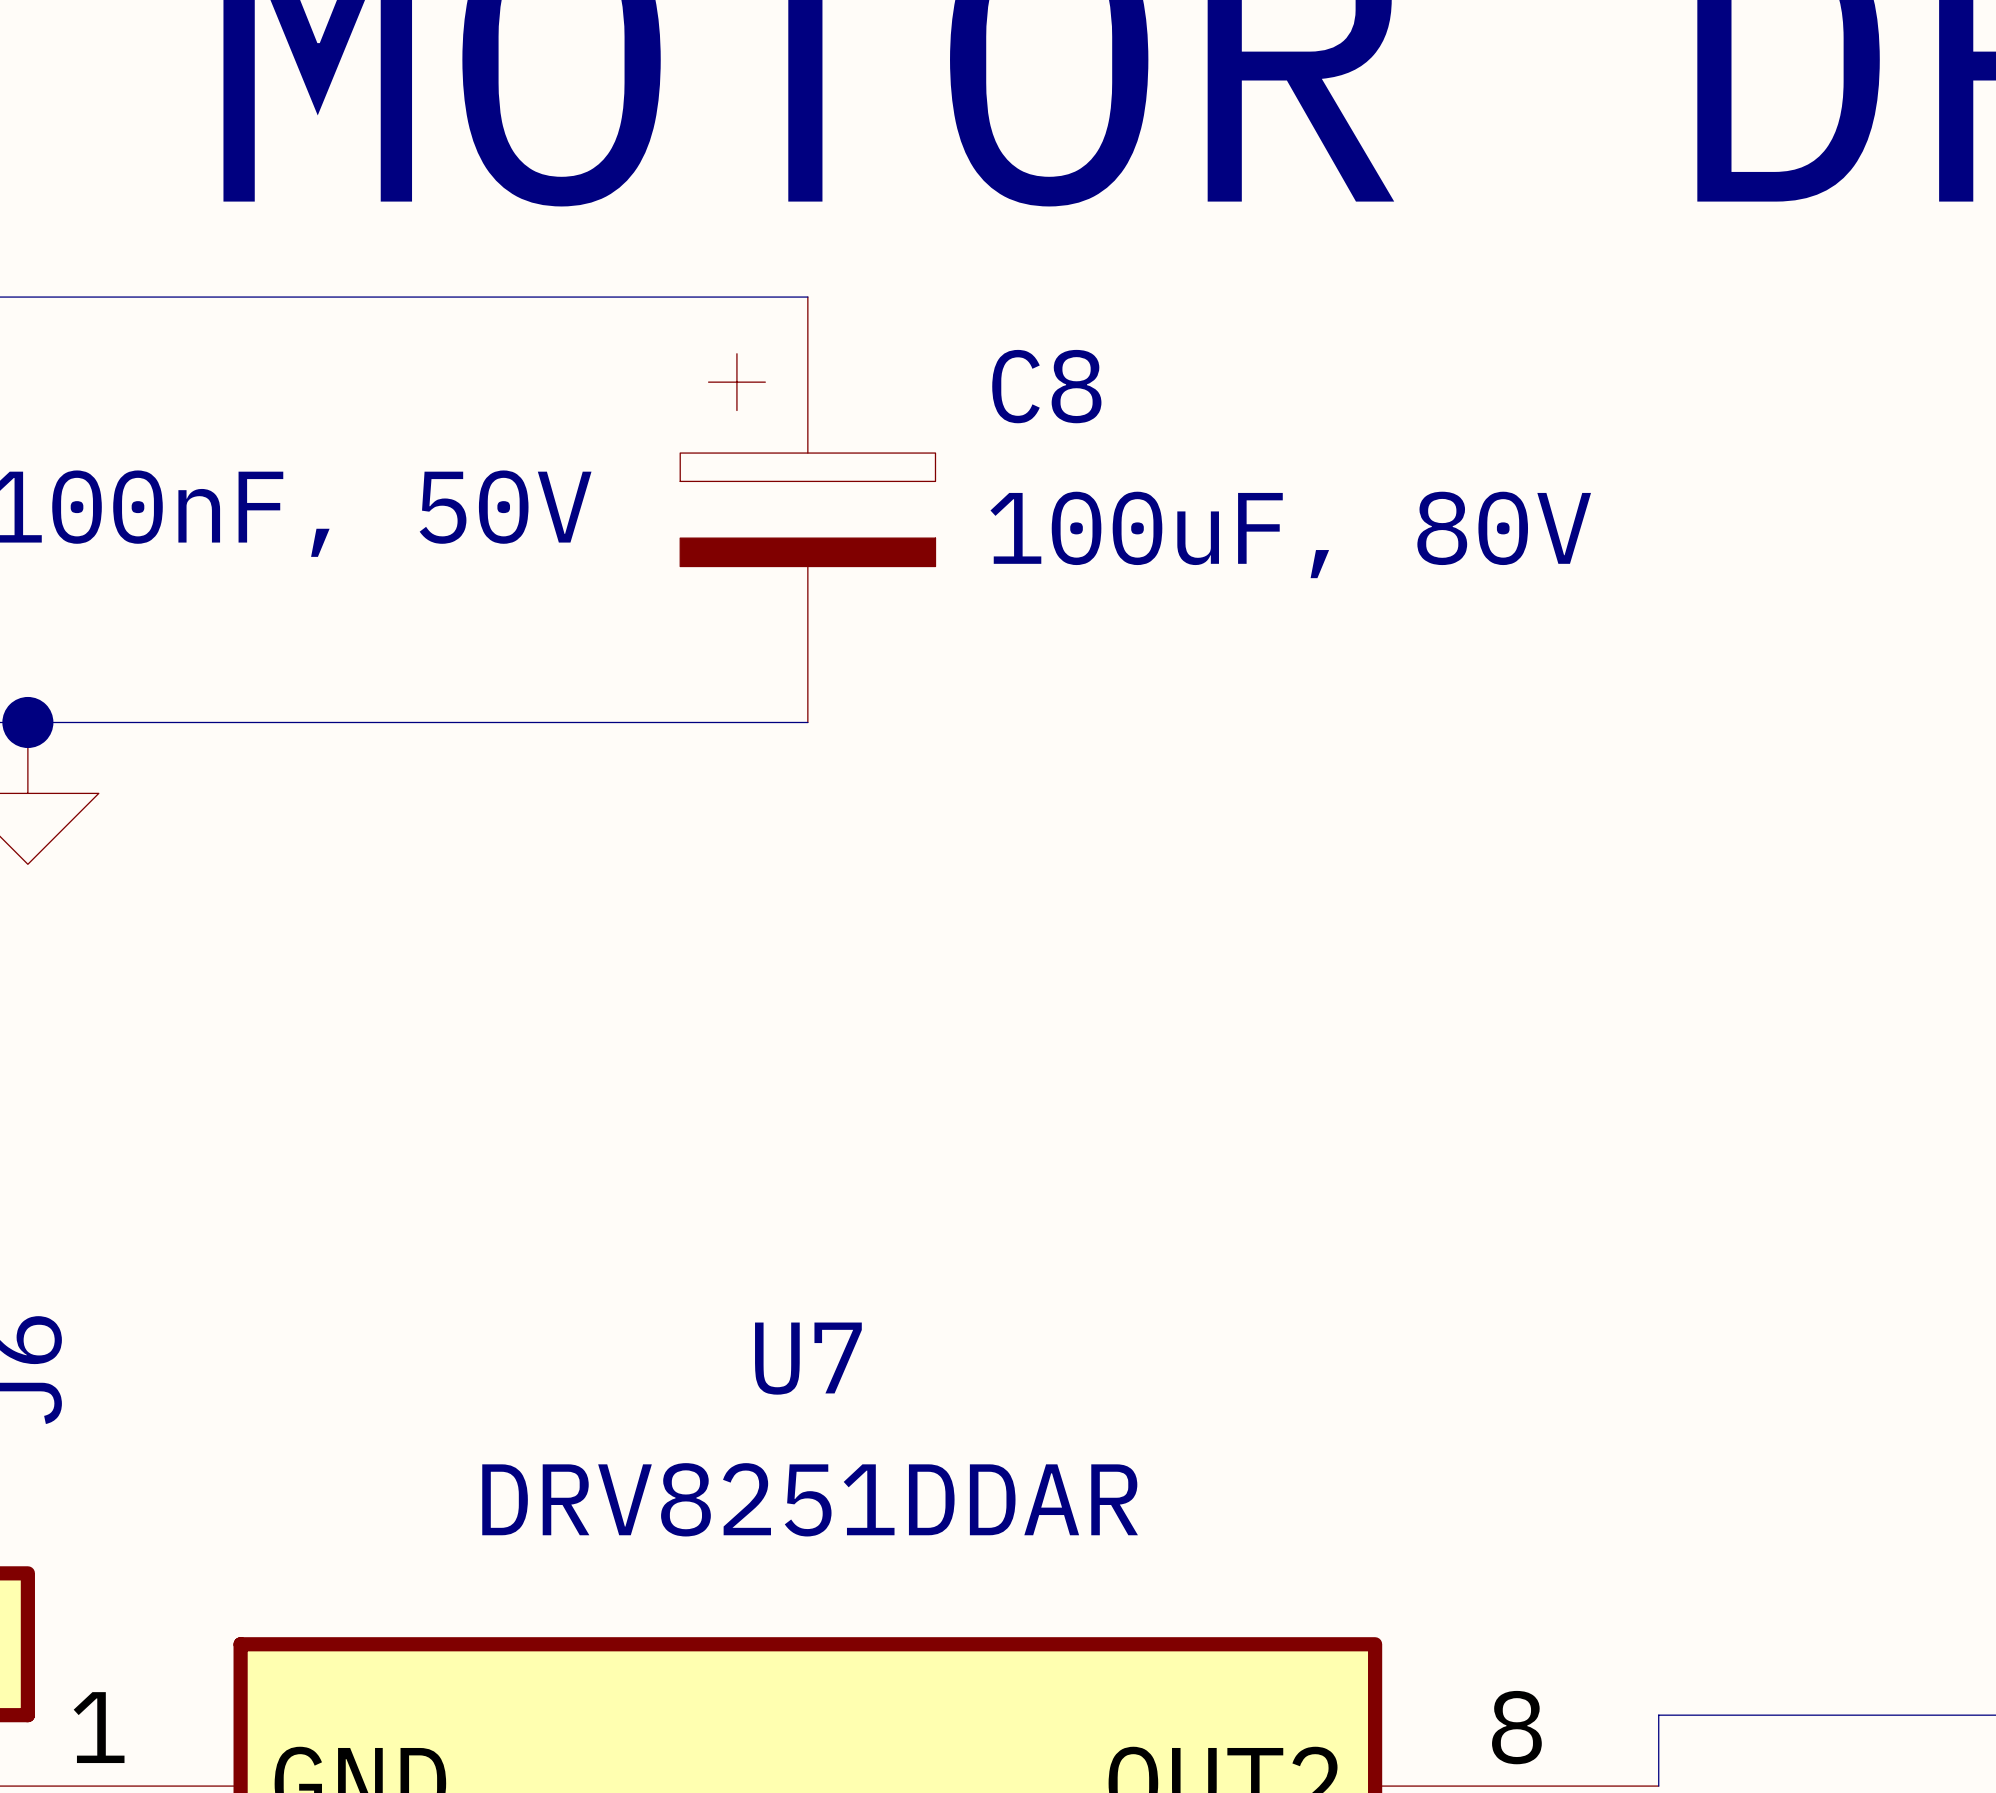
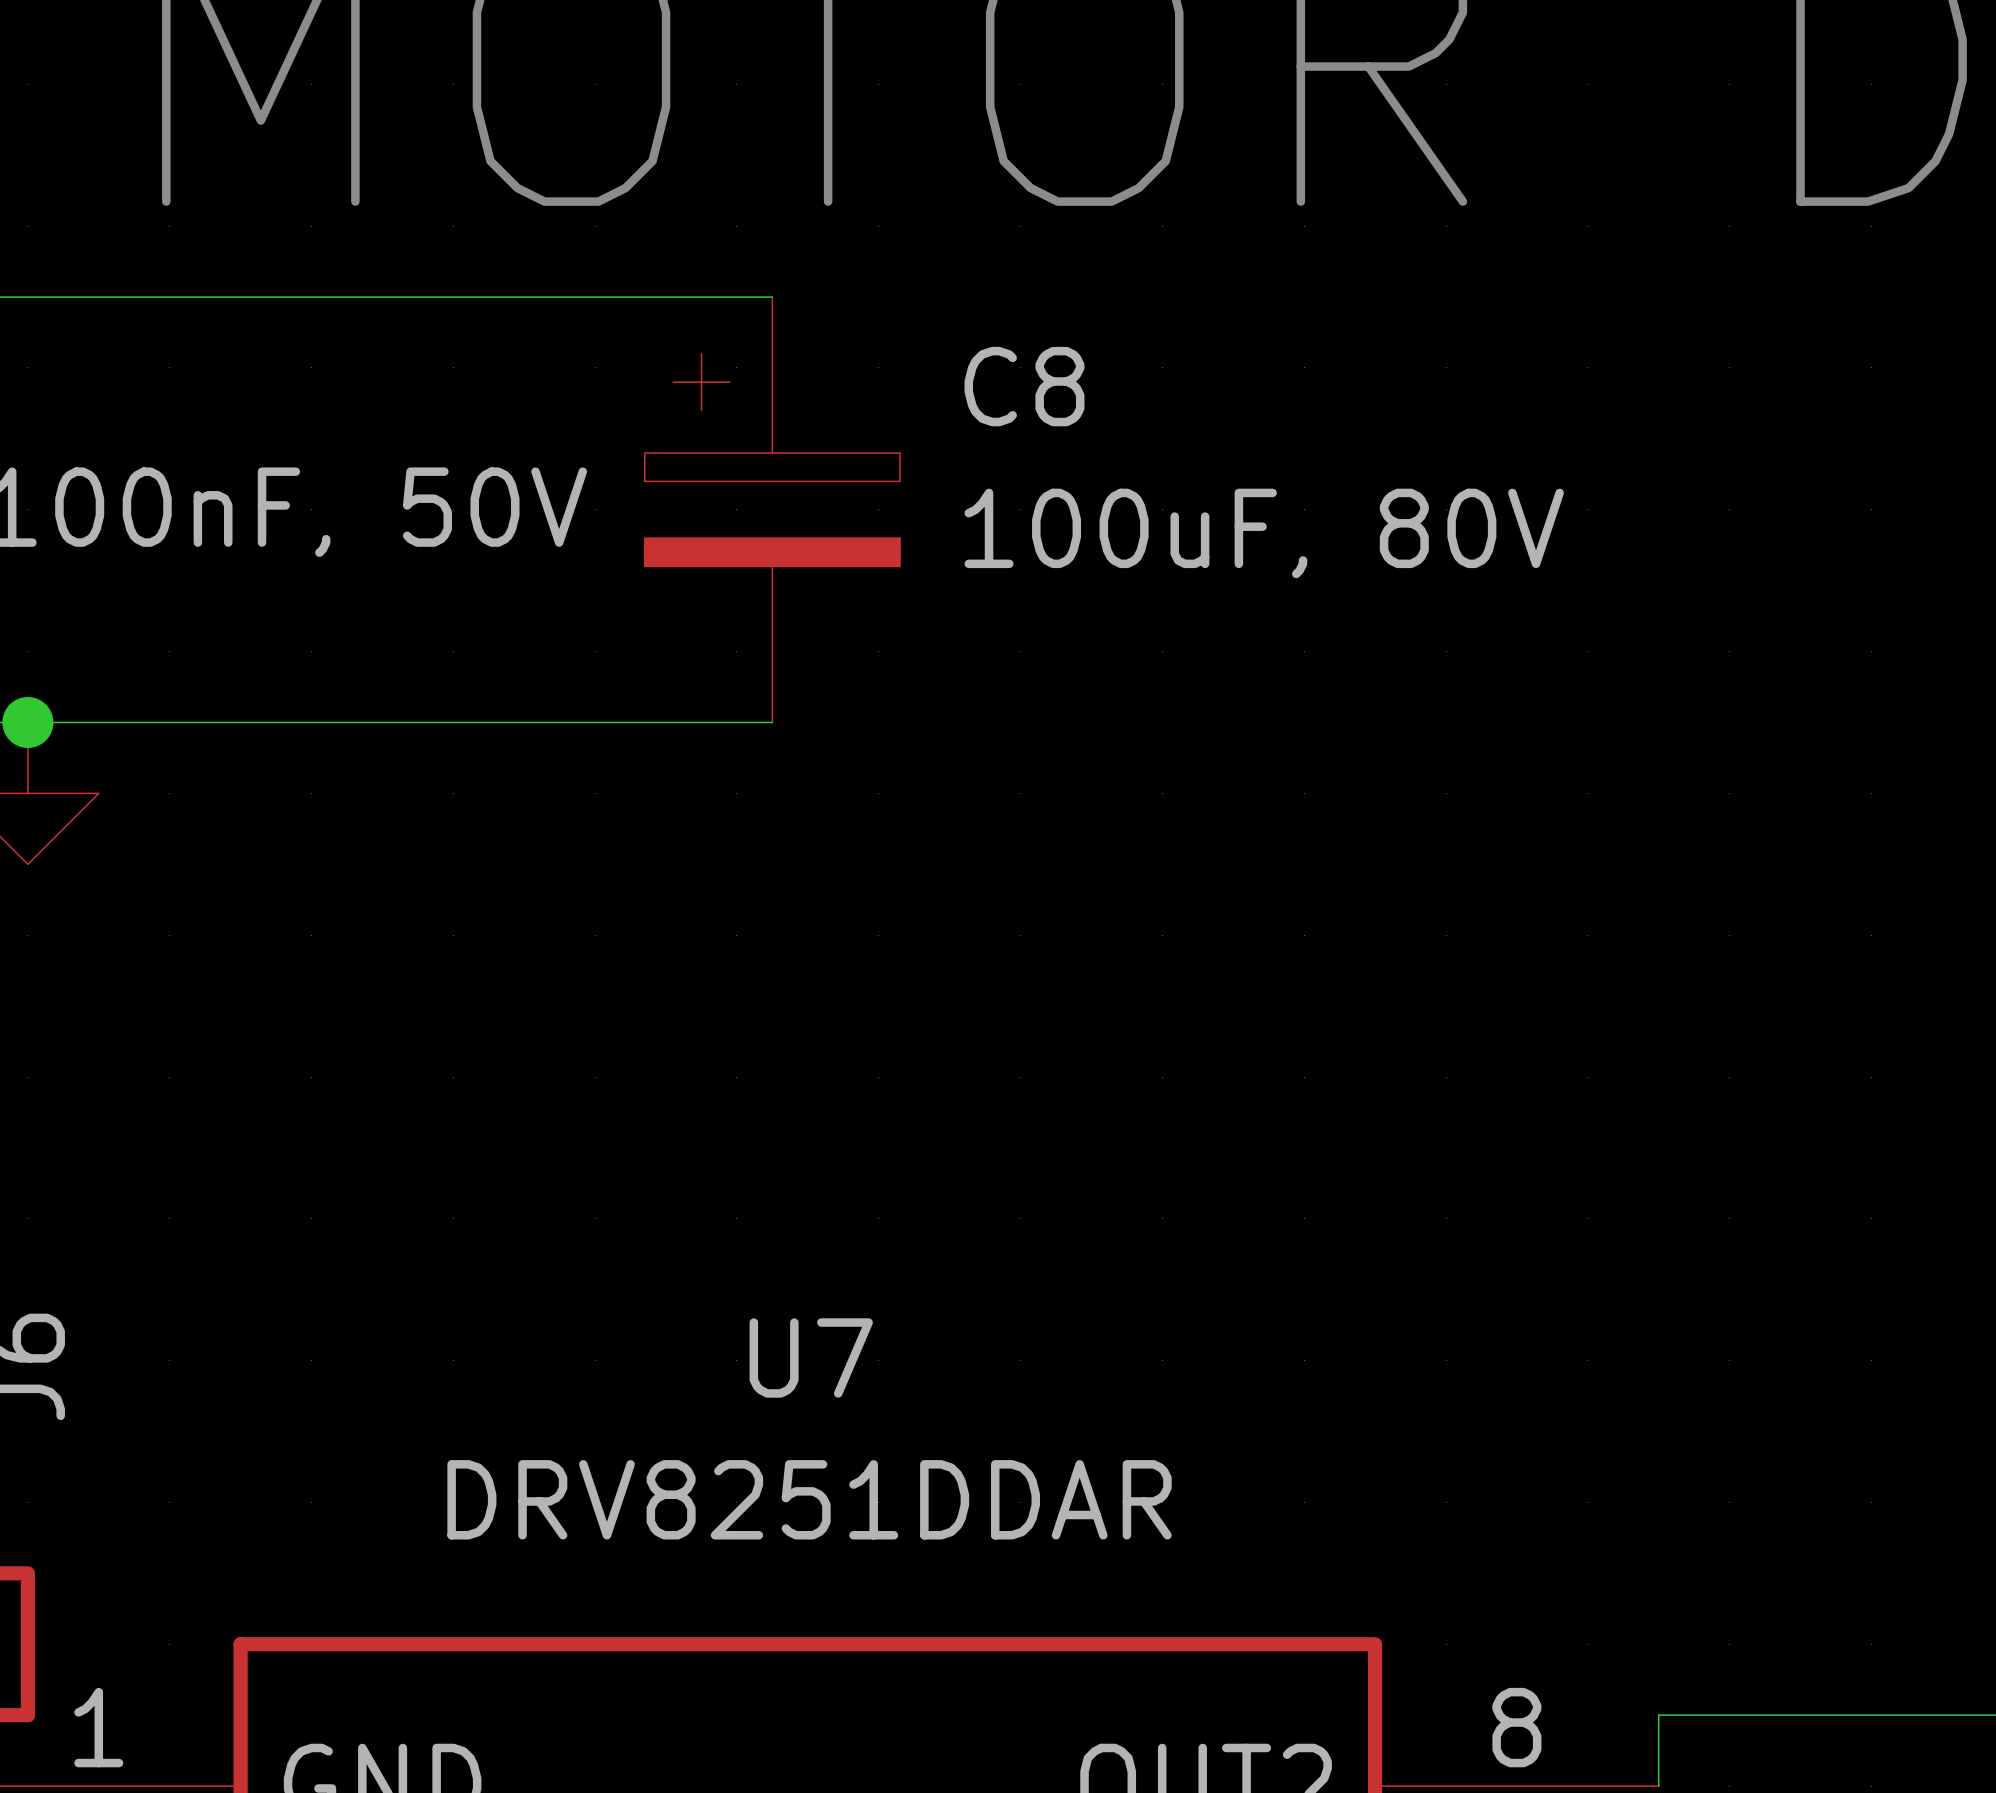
wire: (772, 297) (807, 297) -> none
C8 position: (807, 509) -> (772, 509)
wire: (772, 722) (807, 722) -> none

